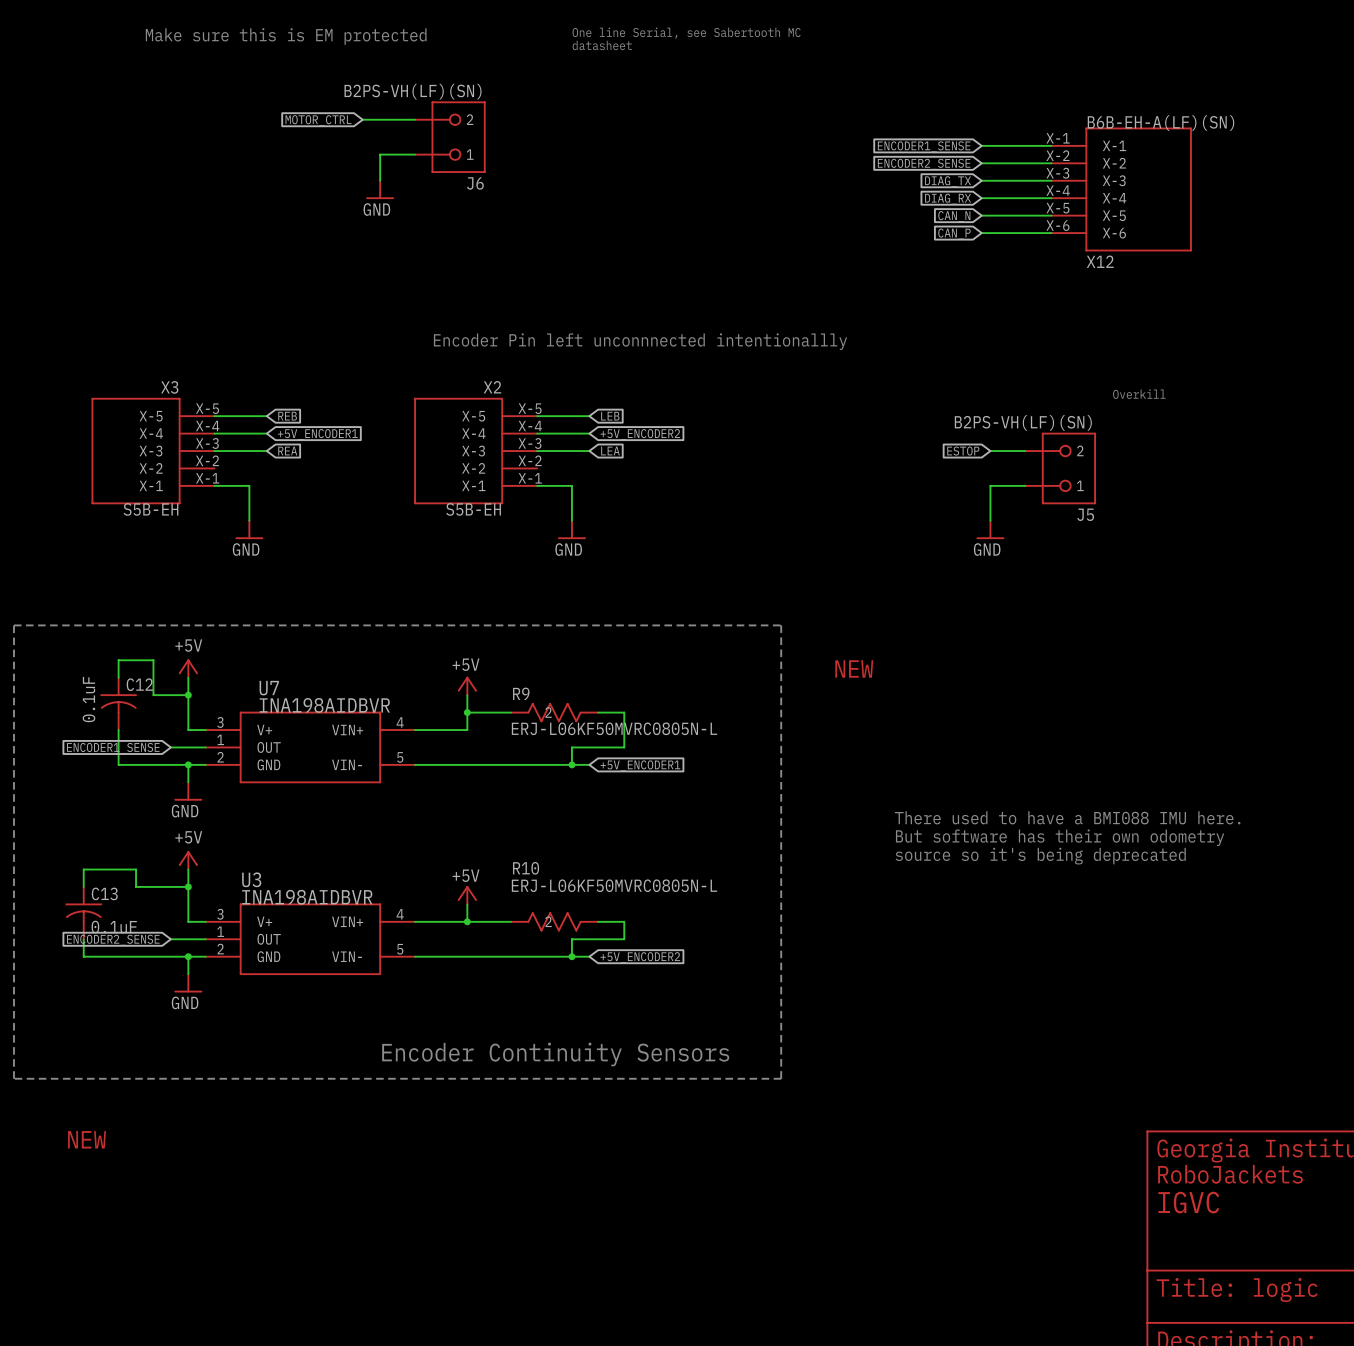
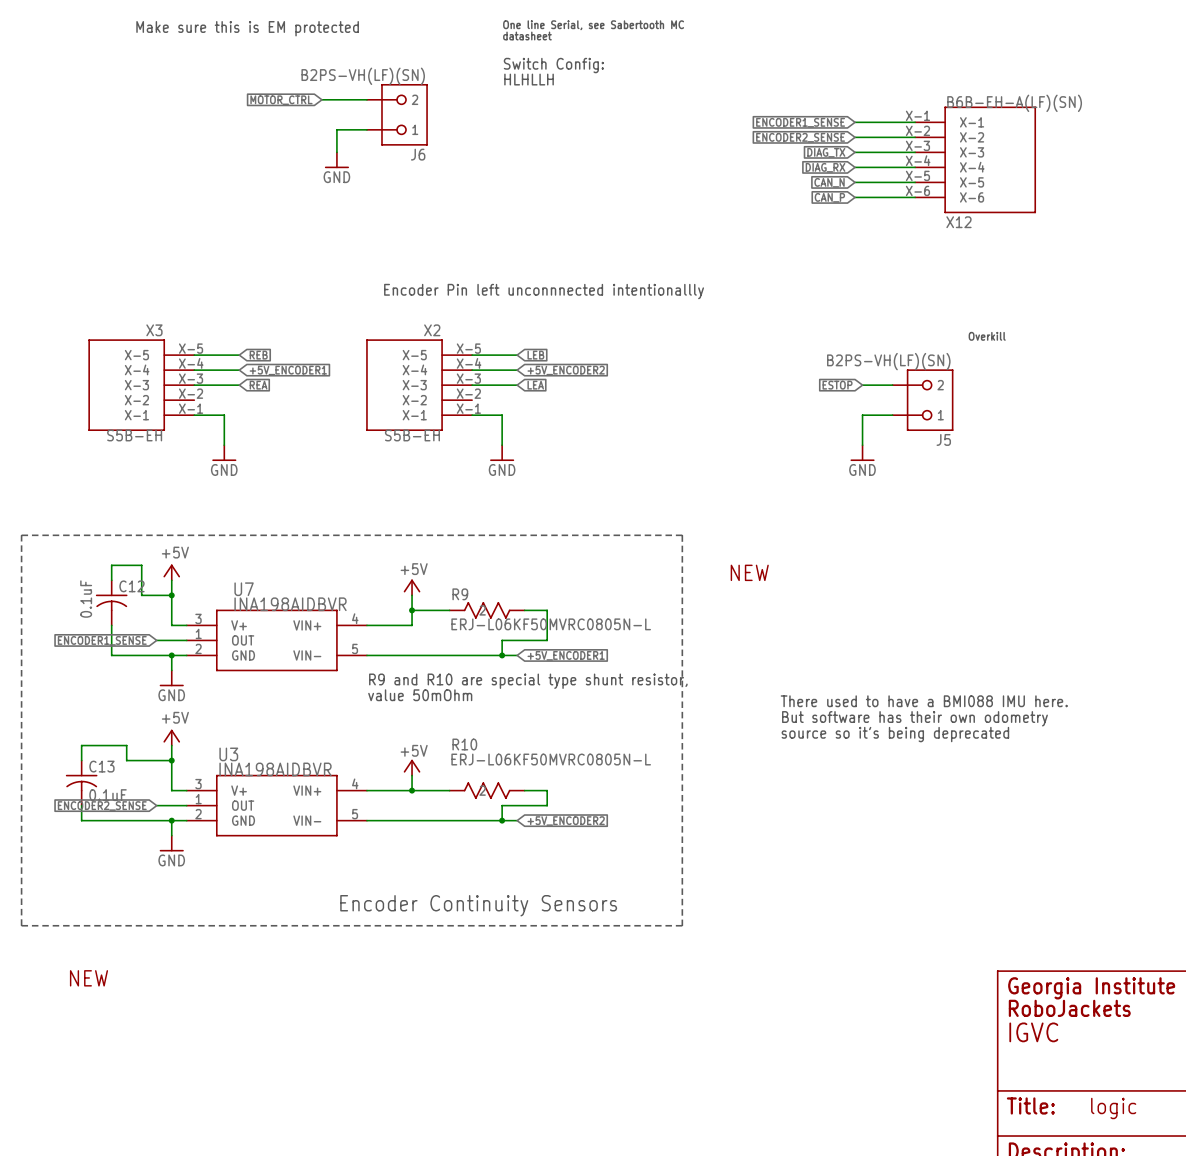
text: none -> Switch Config: (553, 65)
text: none -> HLHLLH (529, 79)
text: none -> R9 and R10 are special type shunt resistor, (528, 681)
text: none -> value 50mOhm (420, 695)

